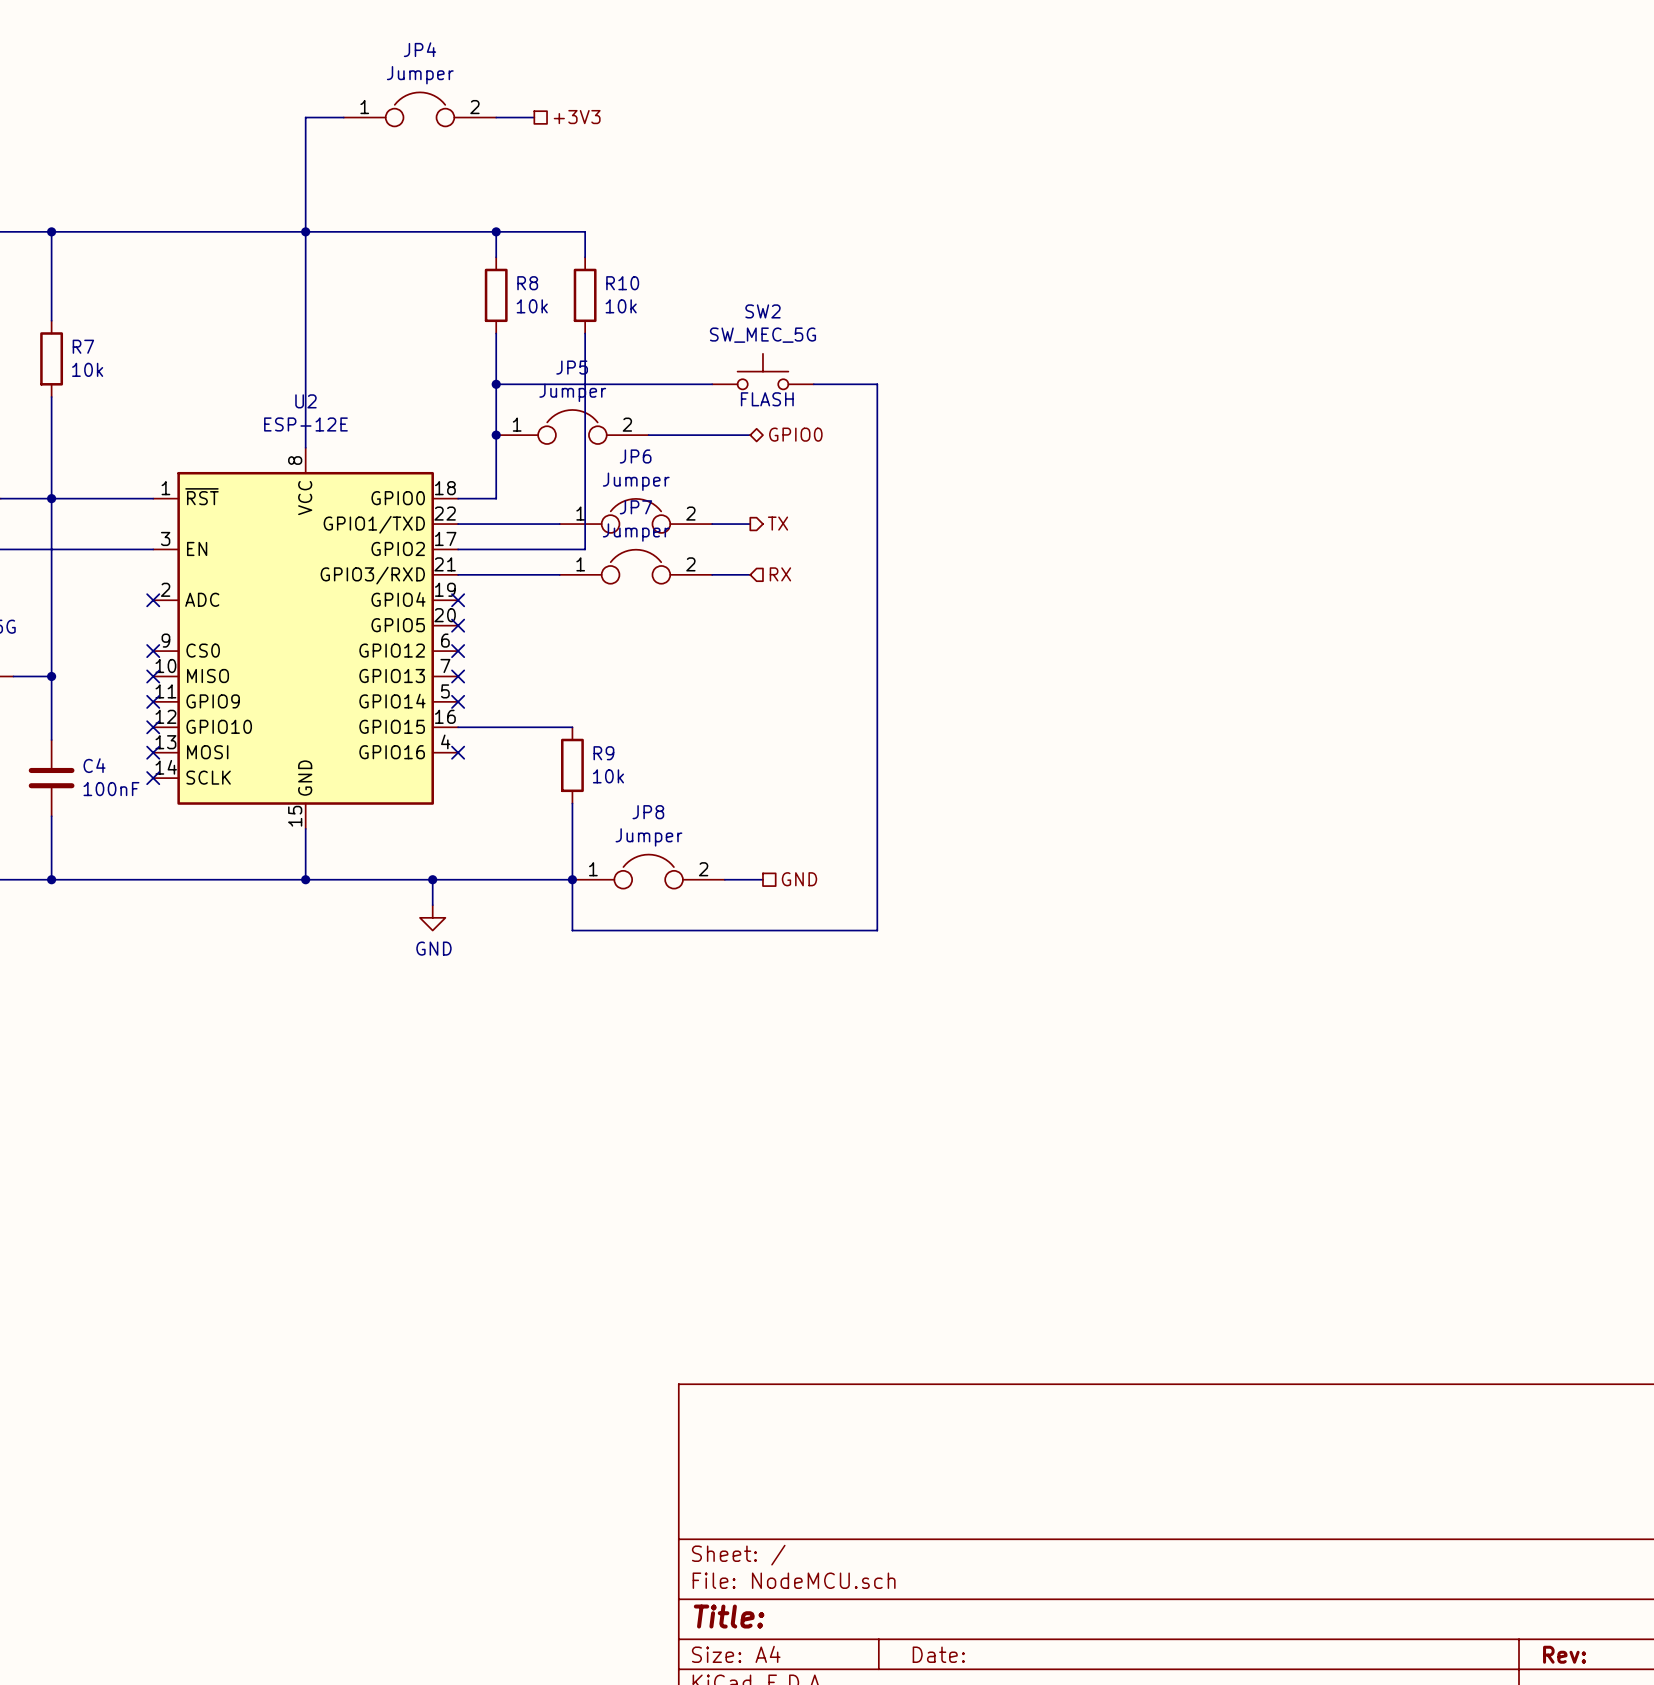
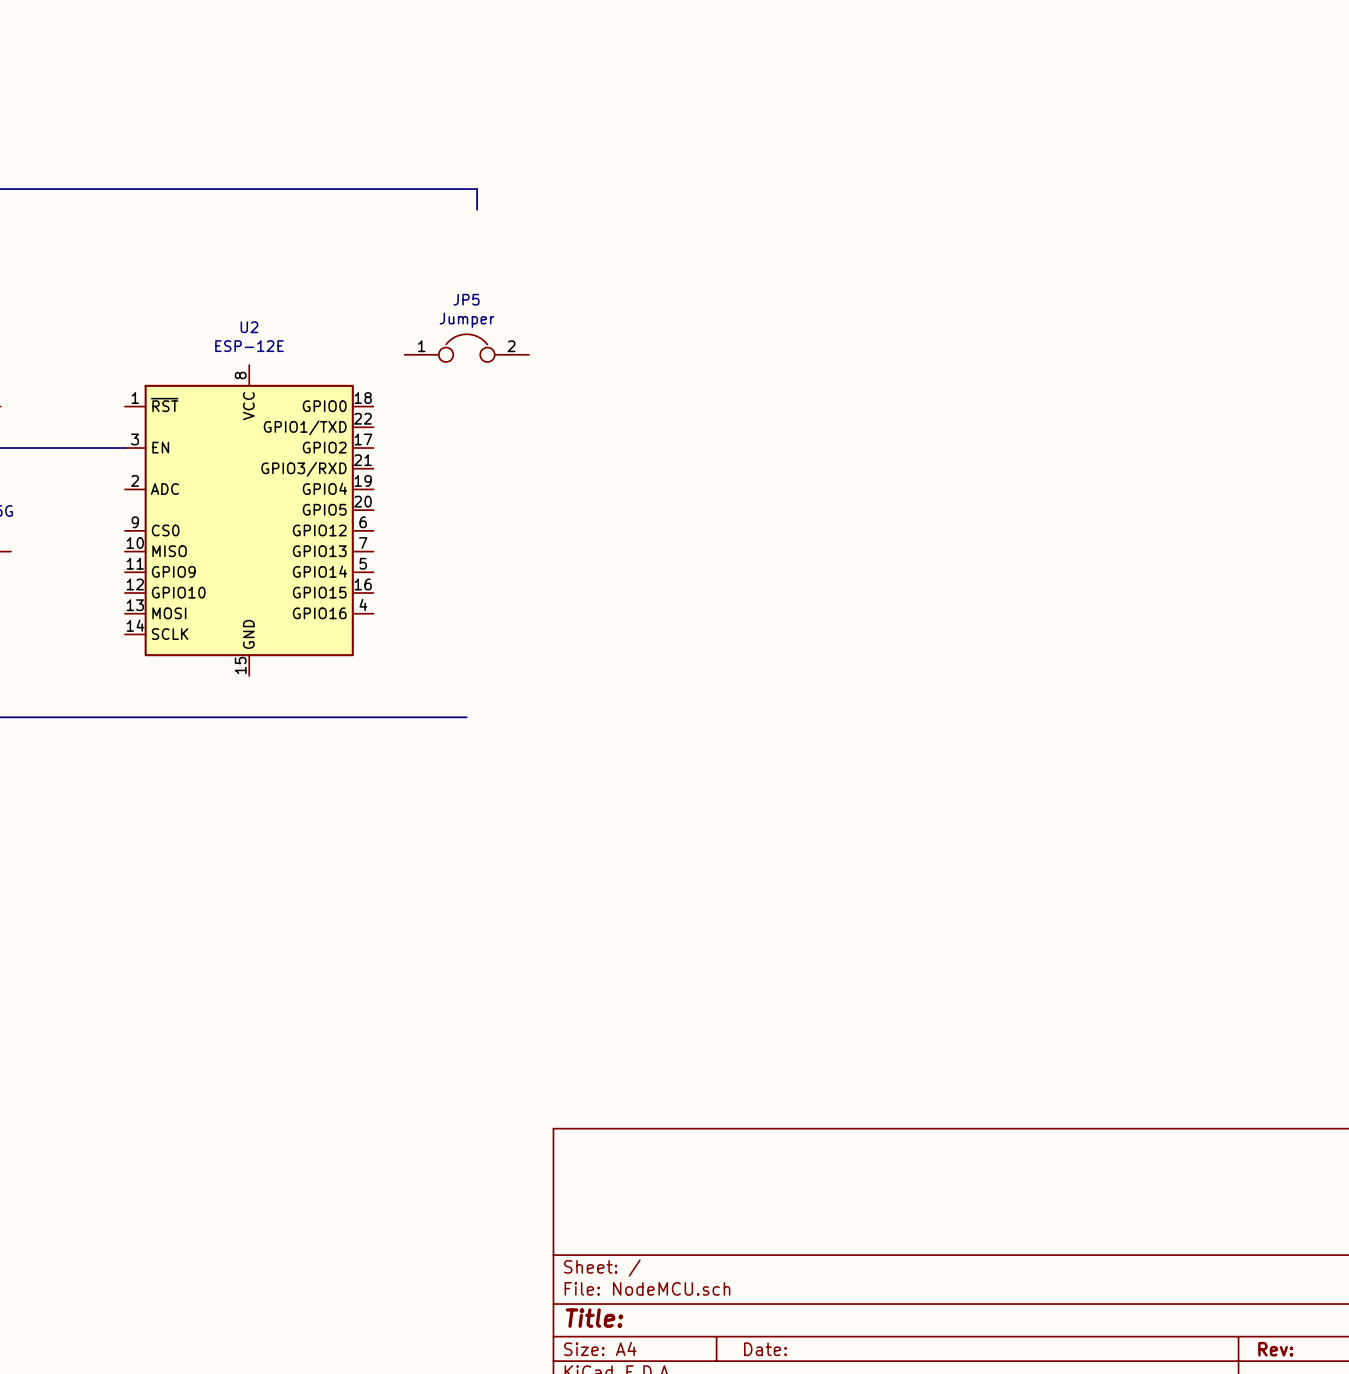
JP4: Jumper (419, 109) -> none
wire: (343, 117) (305, 117) (305, 447) -> none
wire: (496, 117) (534, 117) -> none
hierarchical label: +3V3 (577, 117) -> none
wire: (51, 231) (51, 320) -> none
junction: (51, 231) -> none
junction: (305, 231) -> none
wire: (496, 231) (496, 257) -> none
junction: (496, 231) -> none
R8: 10k (496, 295) -> none
R10: 10k (585, 295) -> none
wire: (496, 333) (496, 498) (458, 498) -> none
wire: (585, 333) (585, 549) (458, 549) -> none
R7: 10k (51, 358) -> none
SW2: SW_MEC_5G (762, 371) -> none
wire: (496, 384) (712, 384) -> none
junction: (496, 384) -> none
wire: (813, 384) (877, 384) (877, 930) (572, 930) (572, 803) -> none
wire: (51, 397) (51, 739) -> none
text: FLASH (767, 399) -> none
hierarchical label: GPIO0 (795, 434) -> none
junction: (496, 435) -> none
wire: (648, 435) (750, 435) -> none
wire: (0, 498) (153, 498) -> none
junction: (51, 498) -> none
JP6: Jumper (635, 515) -> none
hierarchical label: TX (778, 523) -> none
wire: (458, 524) (559, 524) -> none
wire: (712, 524) (750, 524) -> none
JP7: Jumper (635, 566) -> none
wire: (458, 574) (559, 574) -> none
wire: (712, 574) (750, 574) -> none
hierarchical label: RX (780, 574) -> none
no-connect mark: (153, 600) -> none
no-connect mark: (458, 600) -> none
no-connect mark: (458, 625) -> none
no-connect mark: (153, 651) -> none
no-connect mark: (458, 651) -> none
wire: (13, 676) (51, 676) -> none
junction: (51, 676) -> none
no-connect mark: (153, 676) -> none
no-connect mark: (458, 676) -> none
no-connect mark: (153, 701) -> none
no-connect mark: (458, 701) -> none
no-connect mark: (153, 727) -> none
wire: (458, 727) (572, 727) -> none
no-connect mark: (153, 752) -> none
no-connect mark: (458, 752) -> none
R9: 10k (572, 765) -> none
C4: 100nF (51, 778) -> none
no-connect mark: (153, 778) -> none
wire: (51, 816) (51, 879) -> none
wire: (305, 828) (305, 879) -> none
JP8: Jumper (648, 871) -> none
junction: (51, 879) -> none
junction: (305, 879) -> none
wire: (432, 879) (432, 905) -> none
junction: (432, 879) -> none
junction: (572, 879) -> none
wire: (724, 879) (762, 879) -> none
hierarchical label: GND (799, 879) -> none
power symbol: GND (432, 917) -> none

